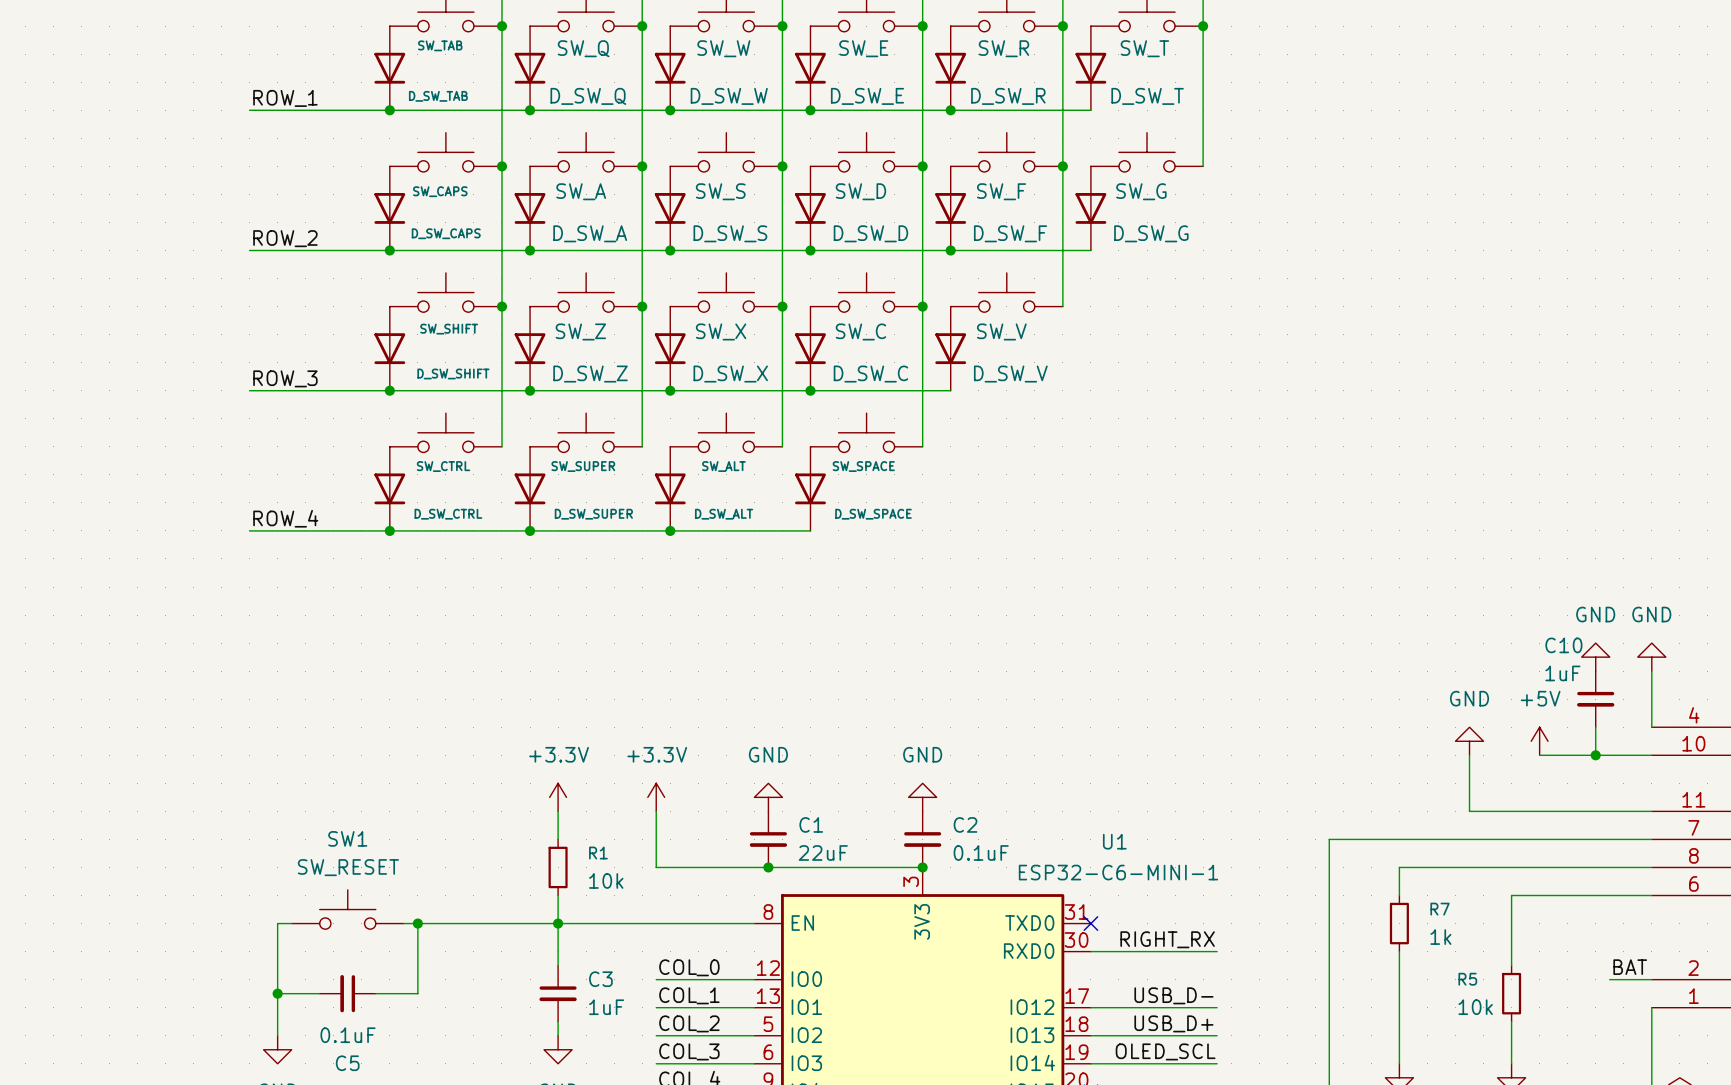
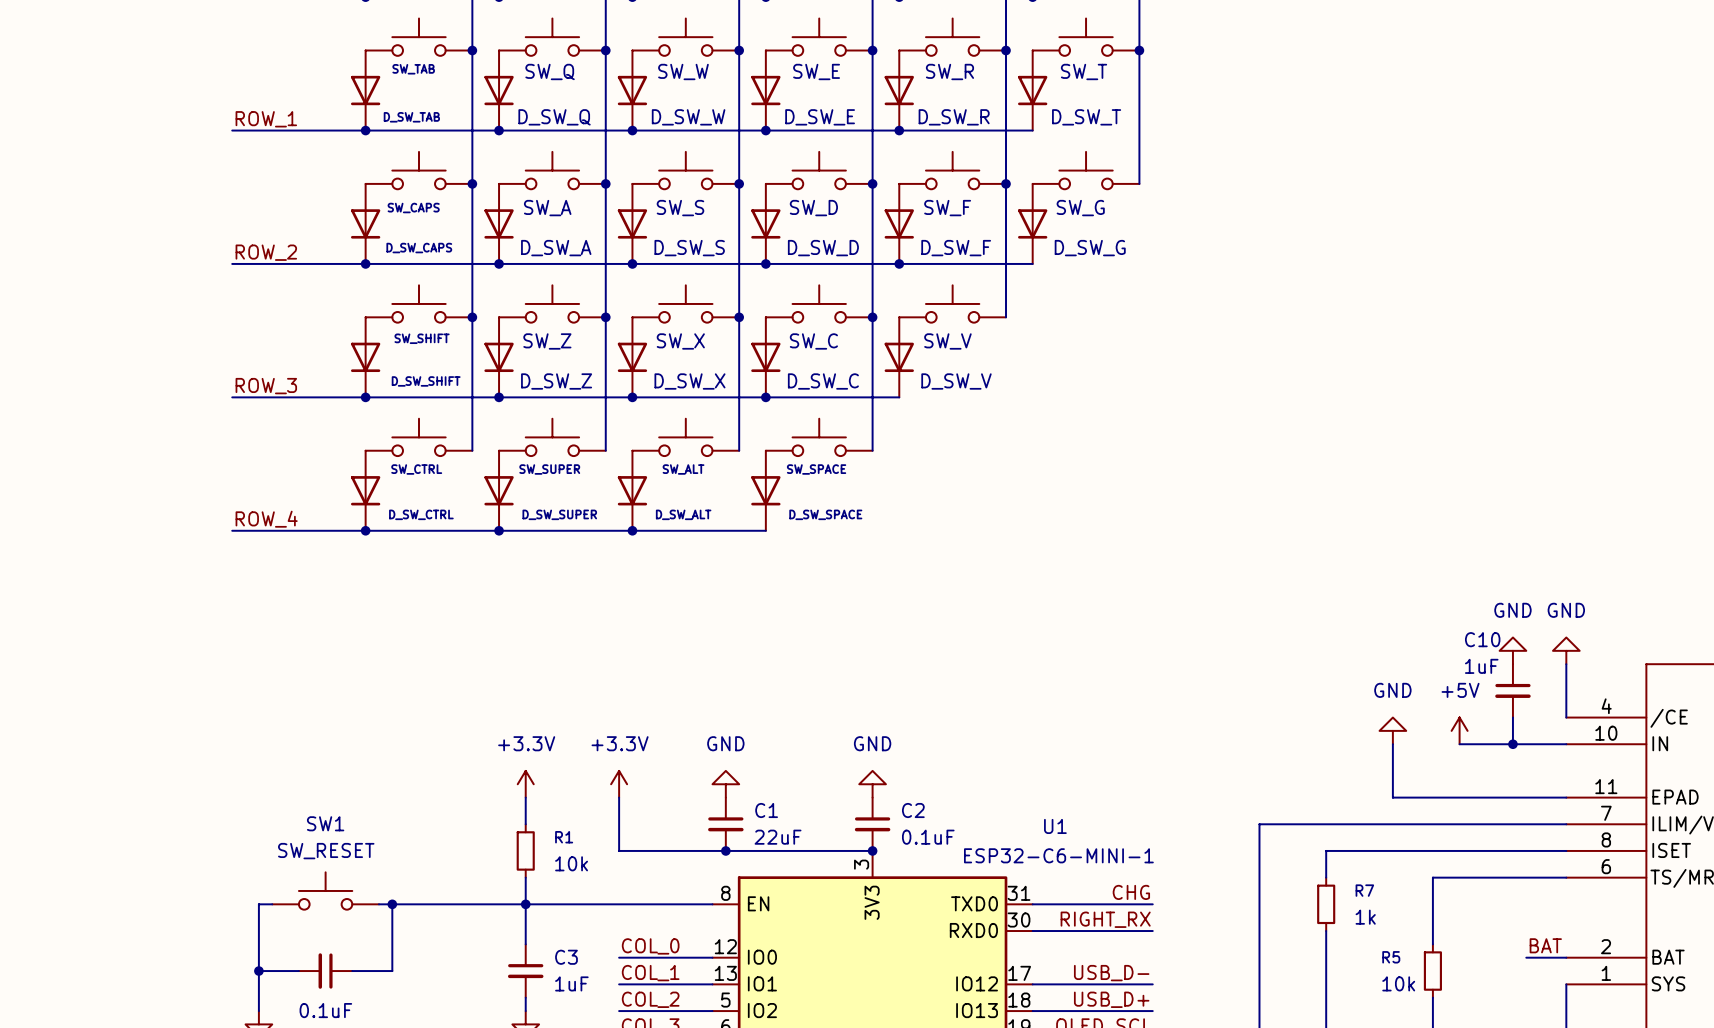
label: none -> CHG (1131, 892)
wire: none -> (1032, 904) (1152, 904)
no-connect mark: (1090, 923) -> none

